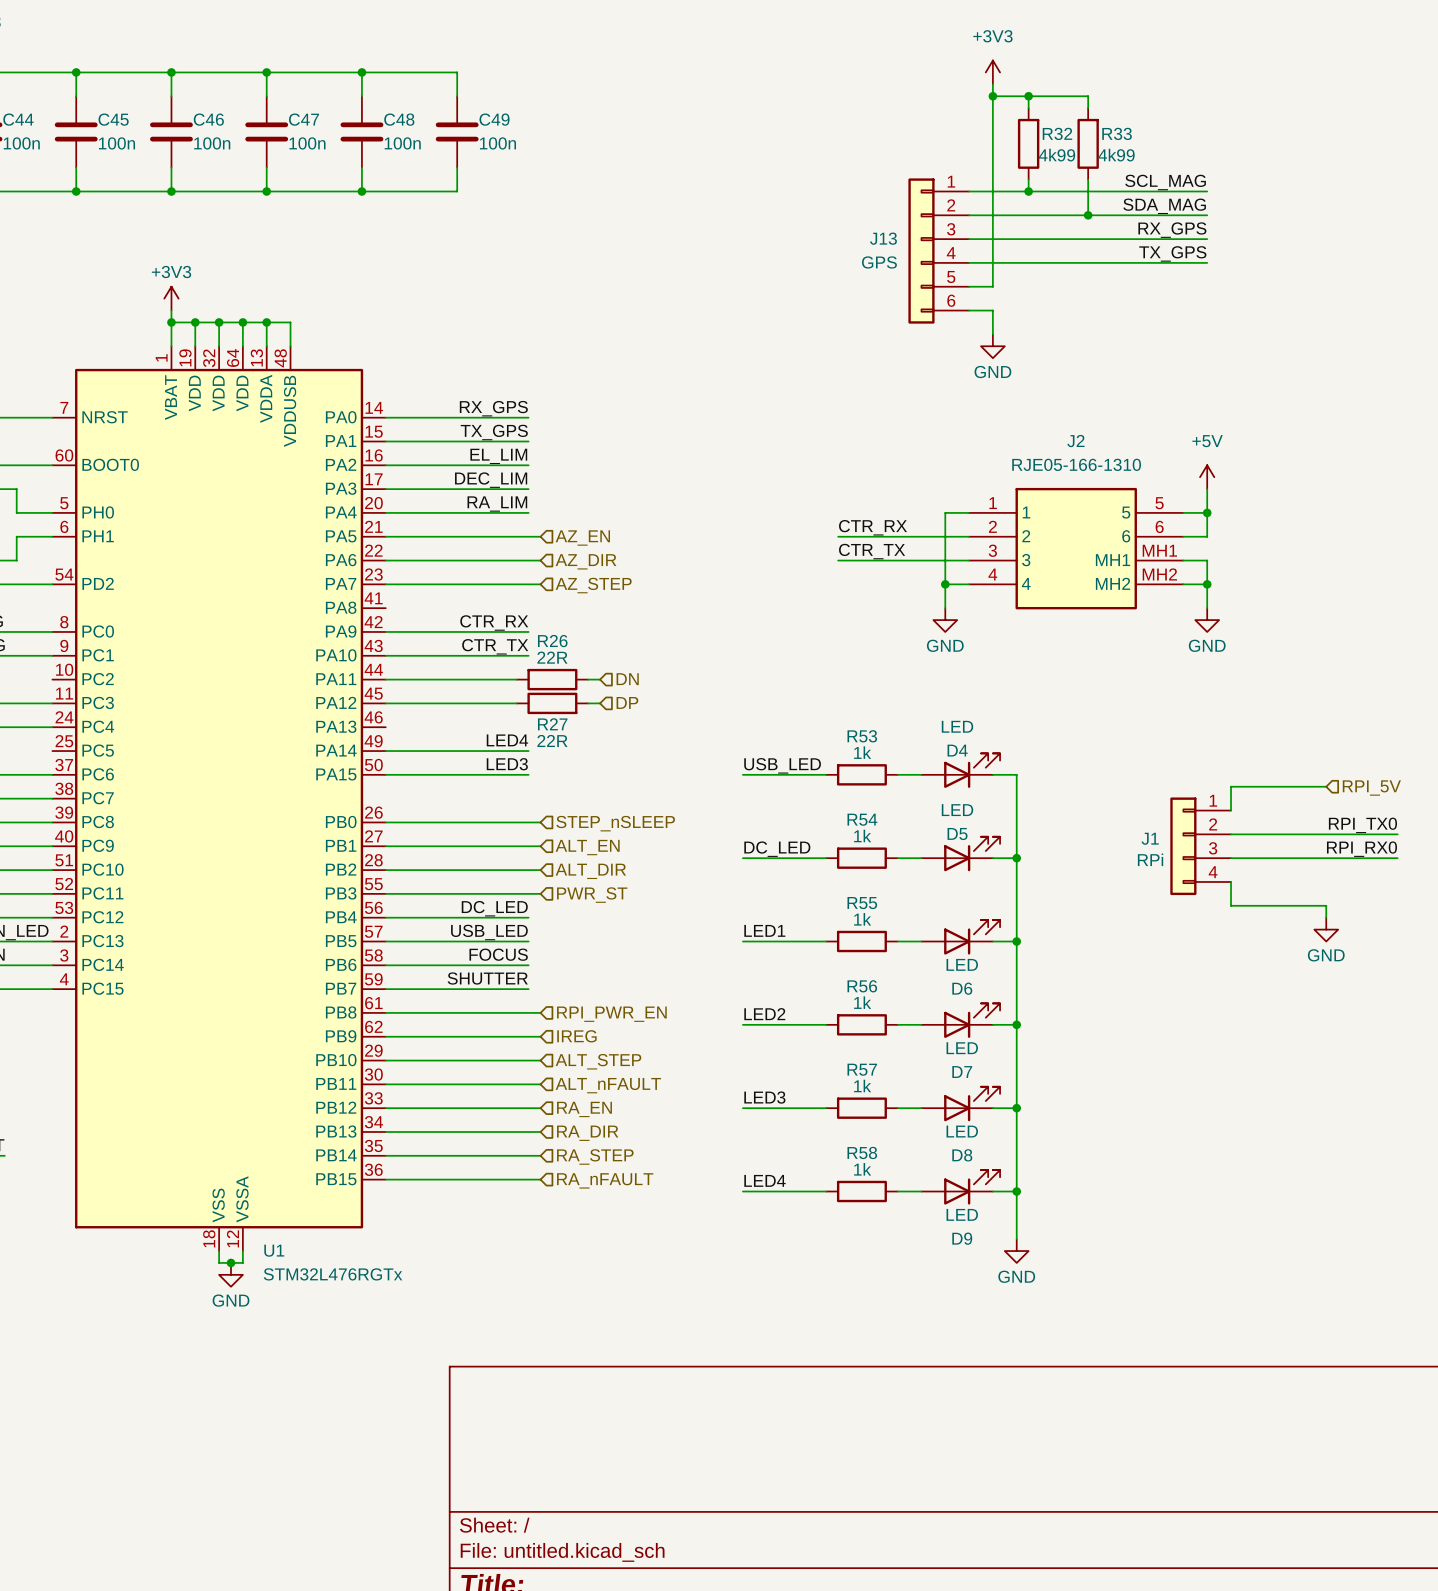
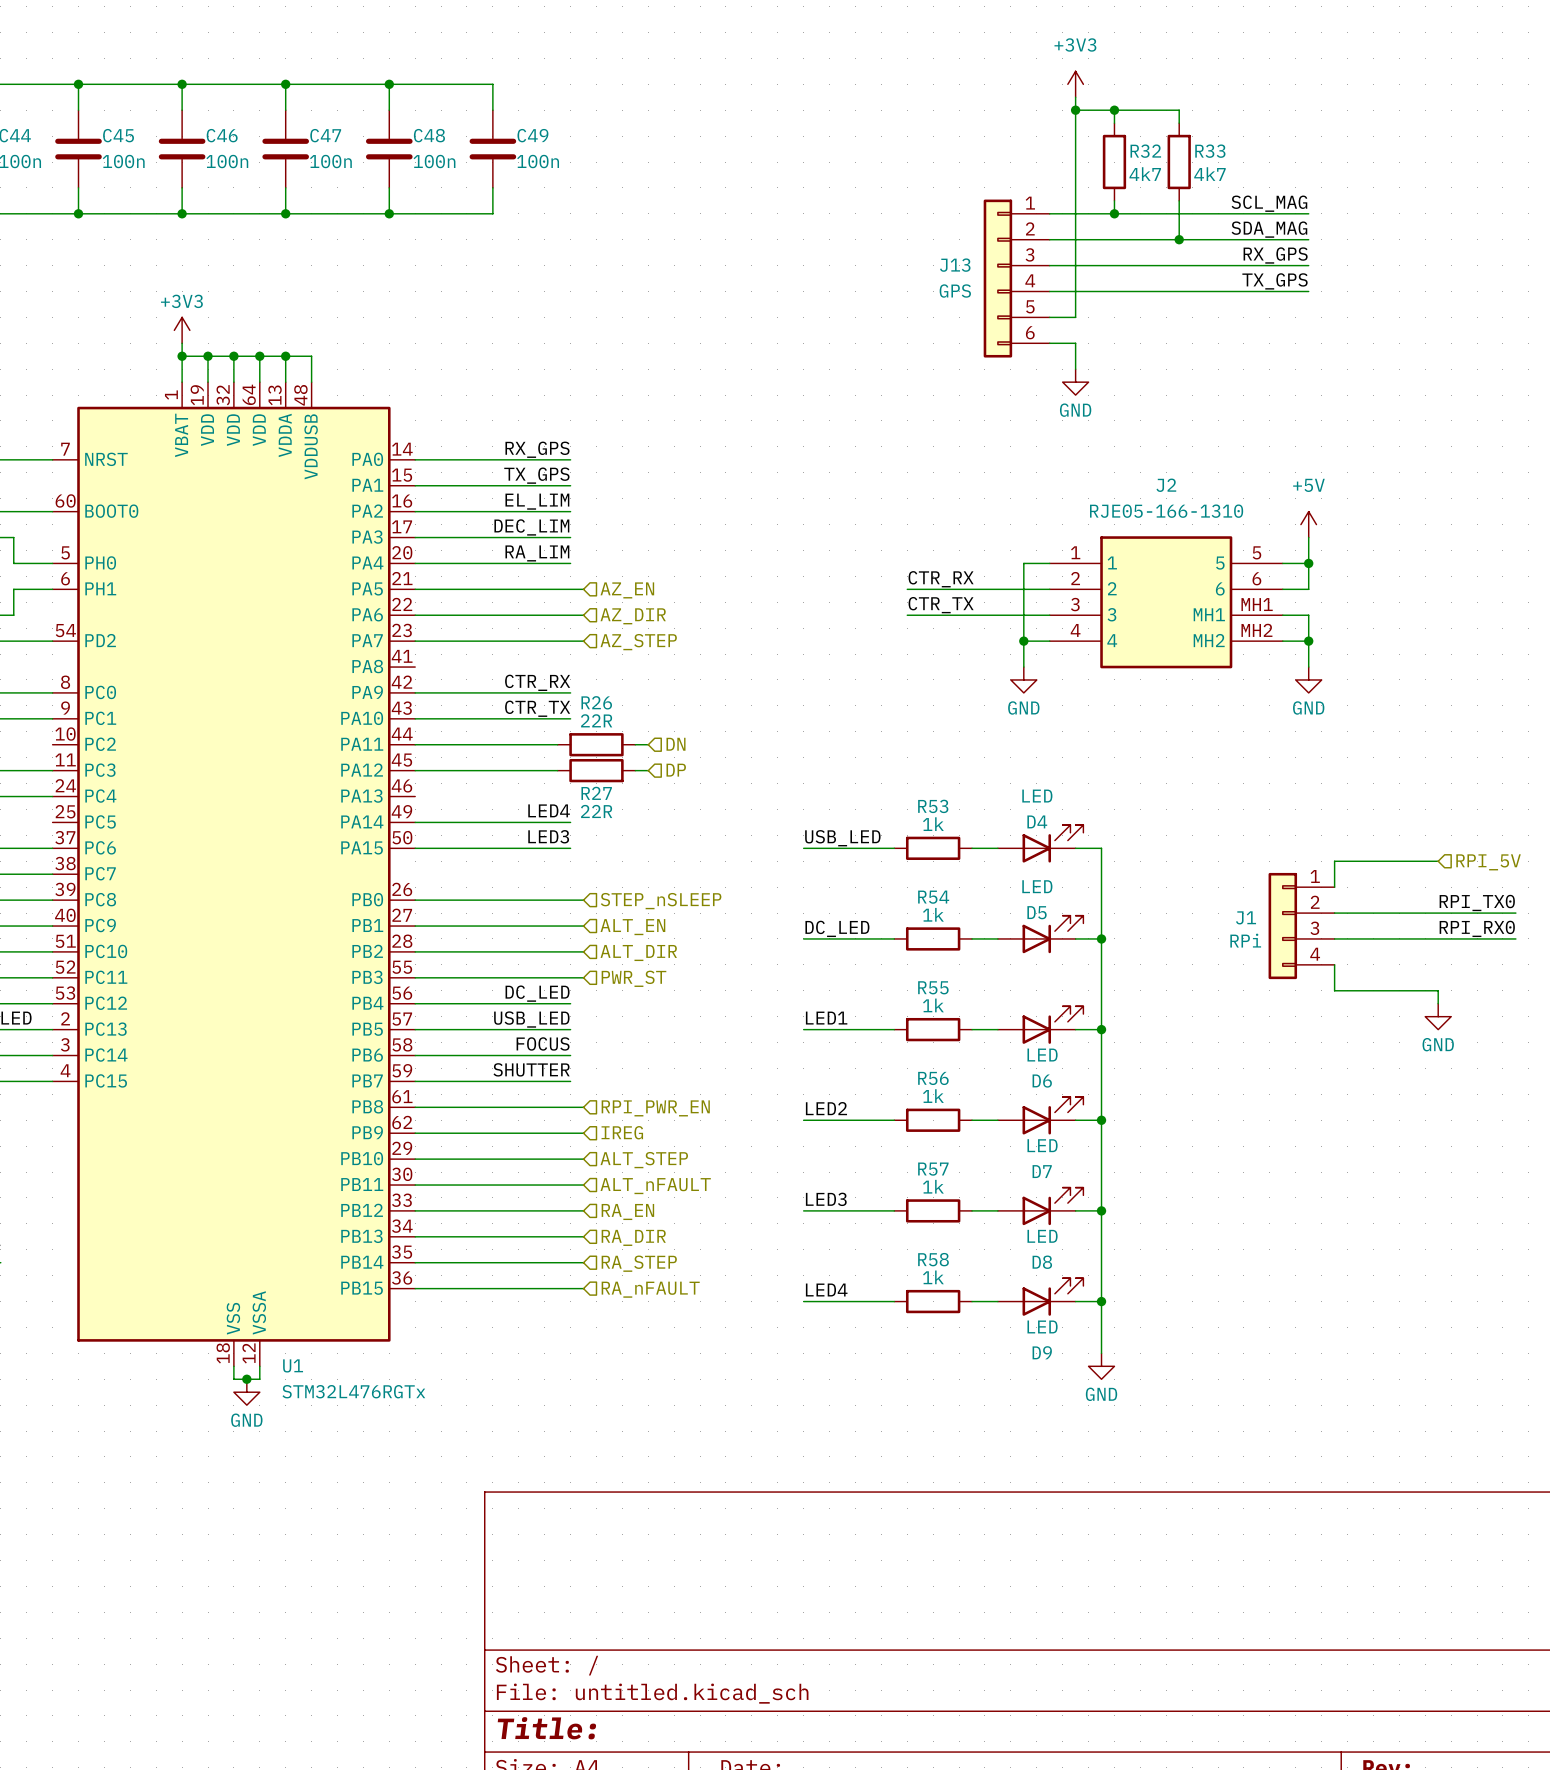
R32 value: 4k99 (1056, 155) -> 4k7 (1145, 174)
R33 value: 4k99 (1116, 155) -> 4k7 (1209, 174)

